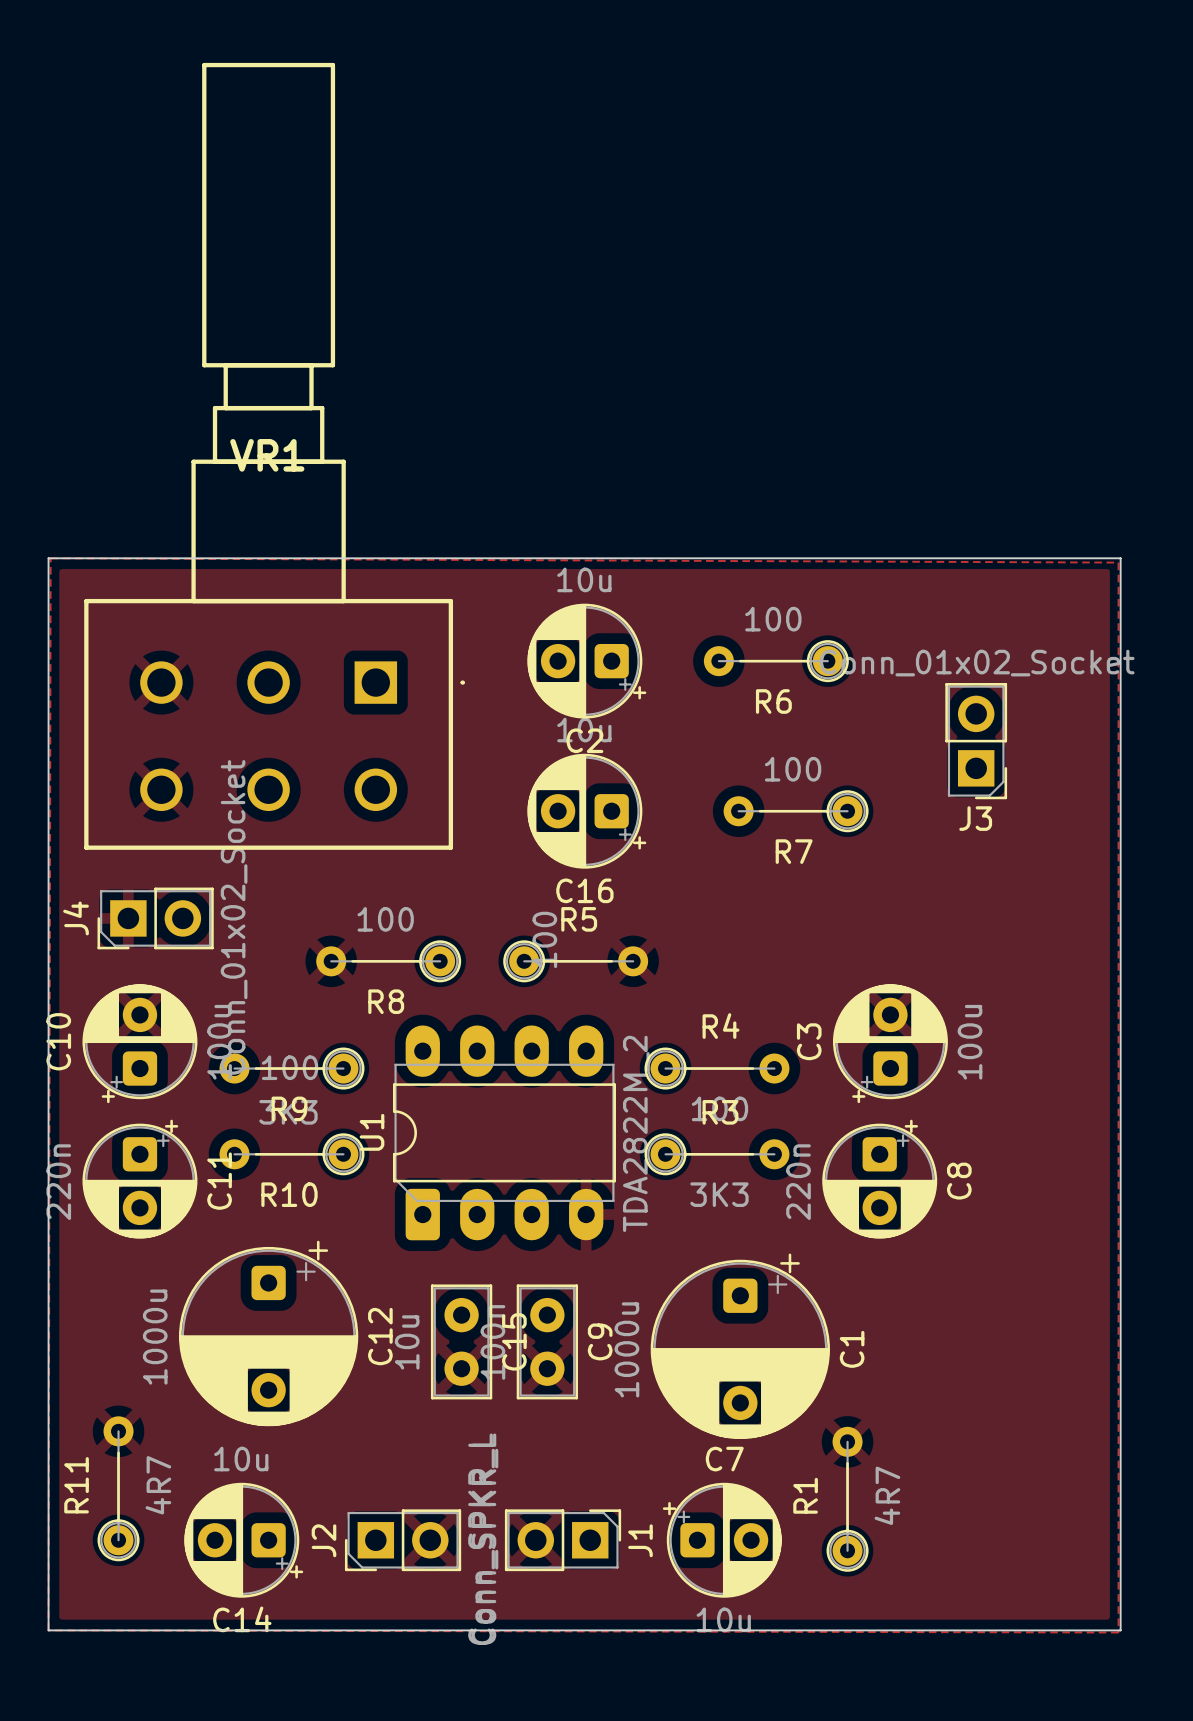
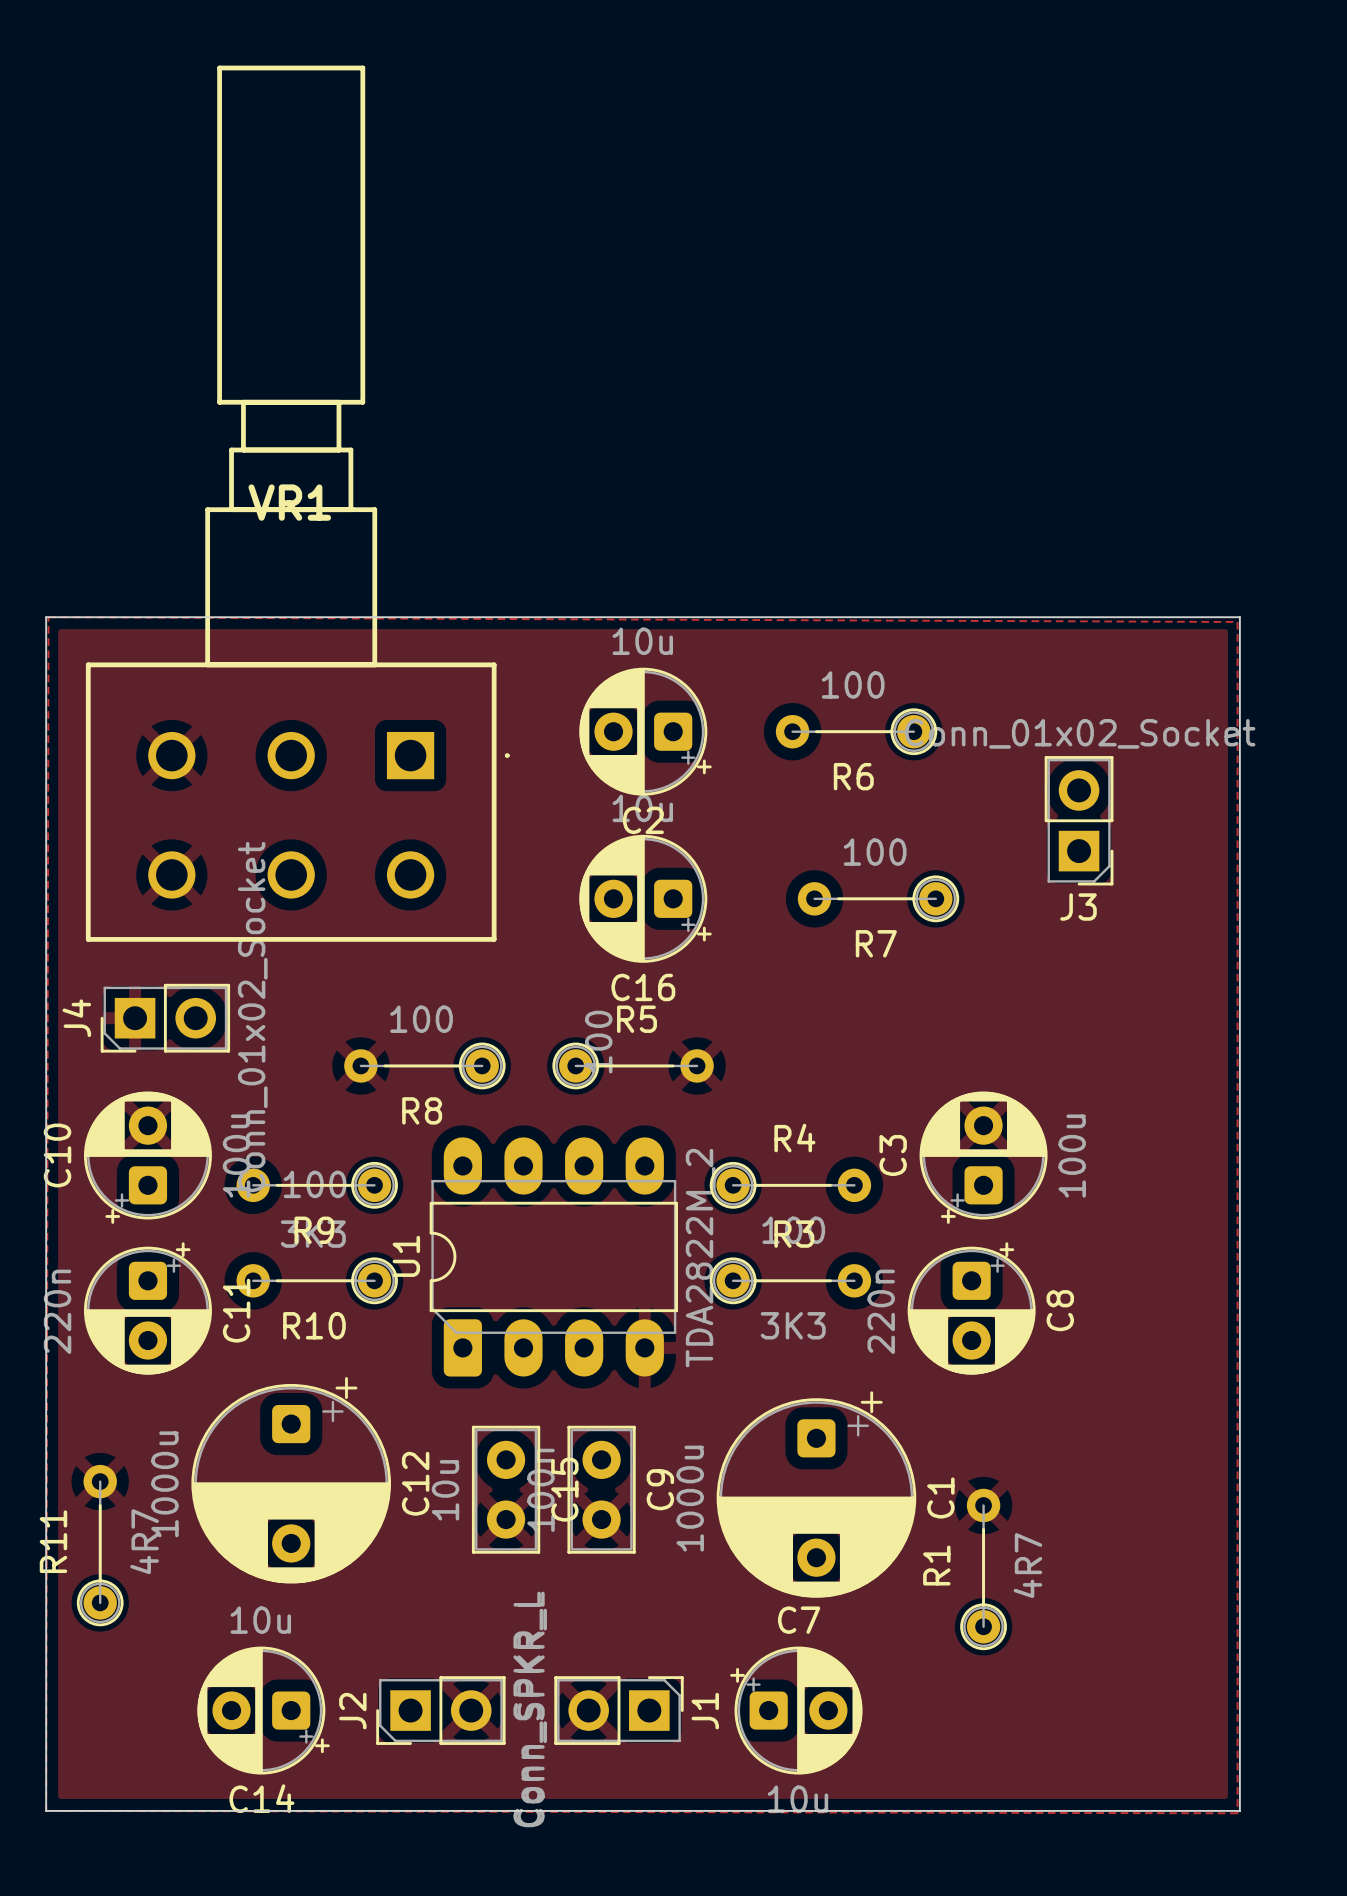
R11 position: (118, 1488) -> (100, 1545)
R1 position: (847, 1499) -> (983, 1569)

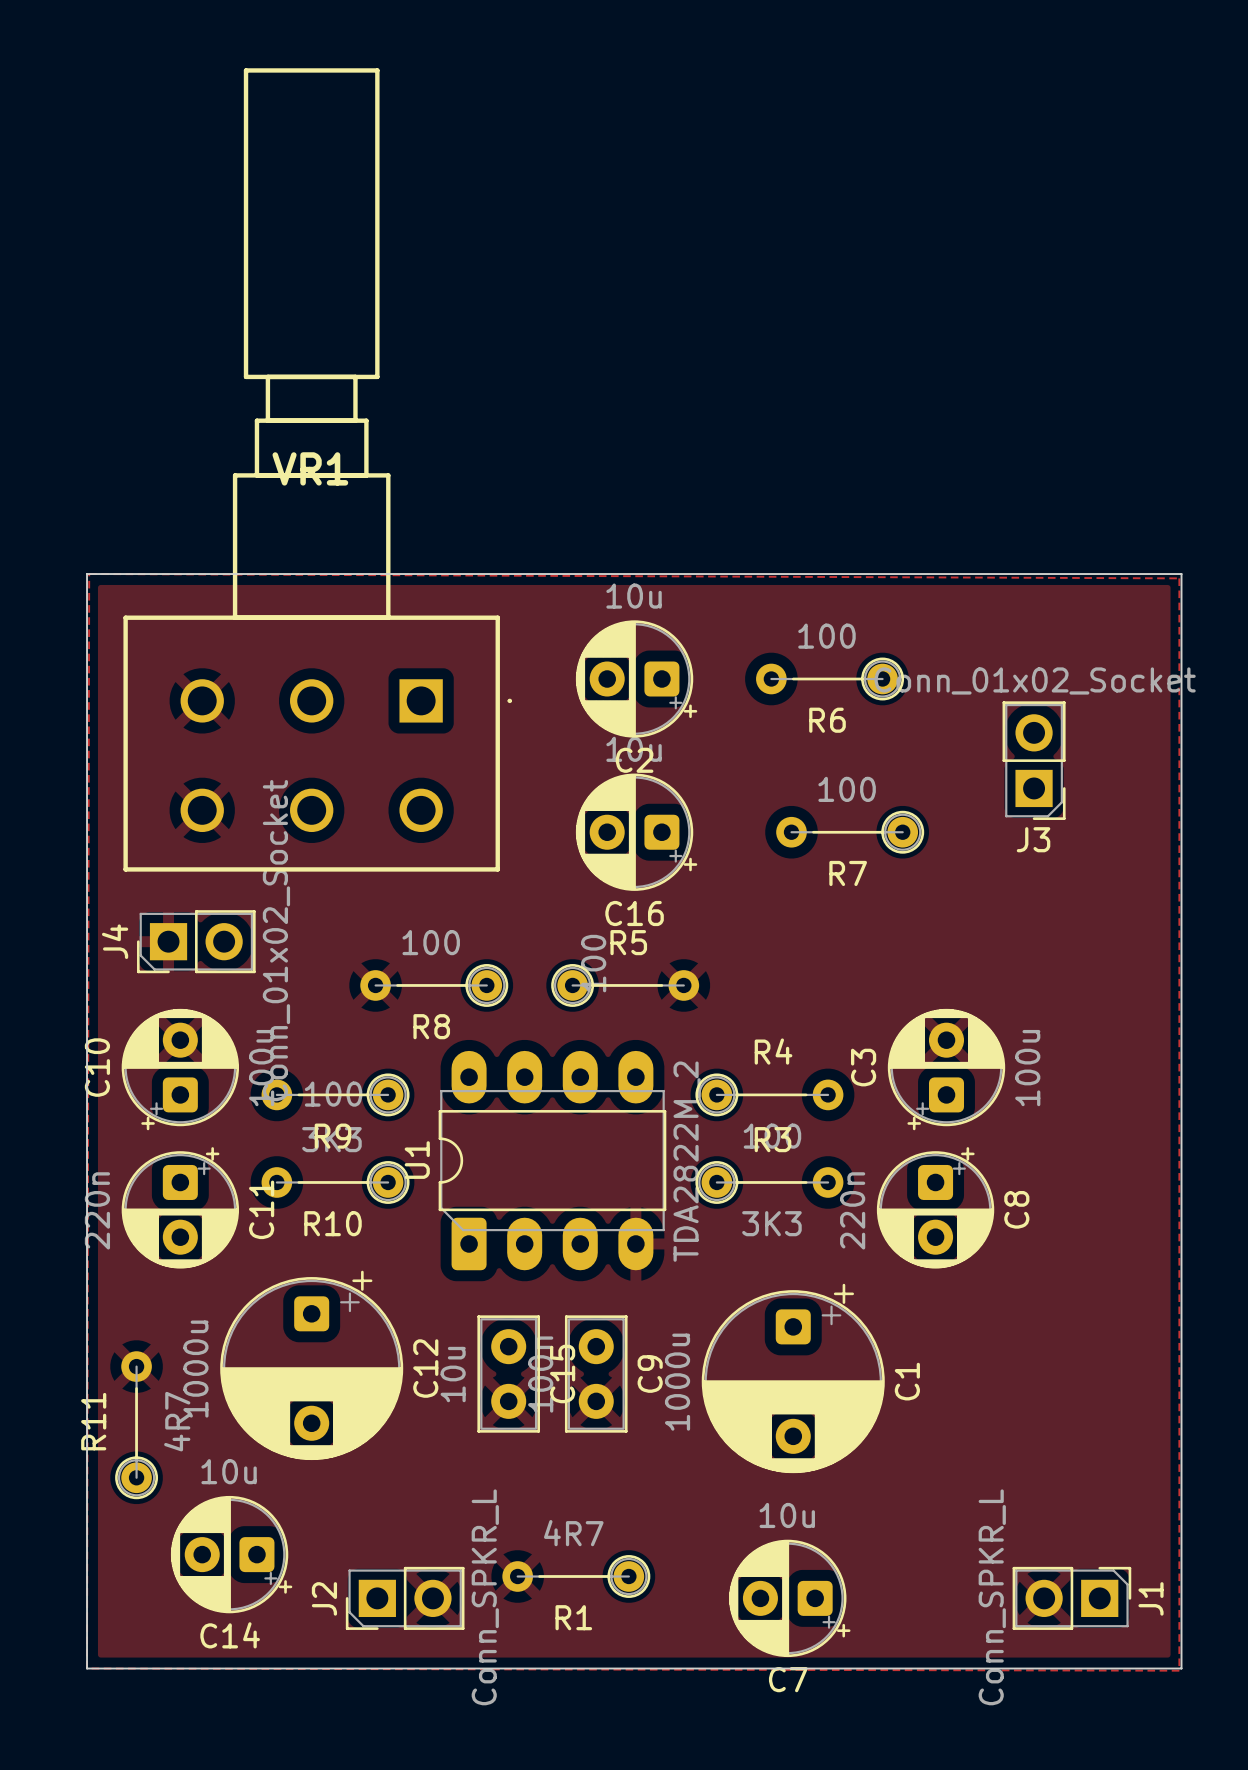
R1 rotation: 0° (983, 1569) -> 90° counterclockwise (576, 1576)
R1 position: (983, 1569) -> (576, 1576)
C14 position: (263, 1710) -> (231, 1554)
J2 position: (440, 1710) -> (405, 1598)
J1 position: (619, 1710) -> (1071, 1598)
C7 rotation: 0° (796, 1710) -> 180° (789, 1598)

